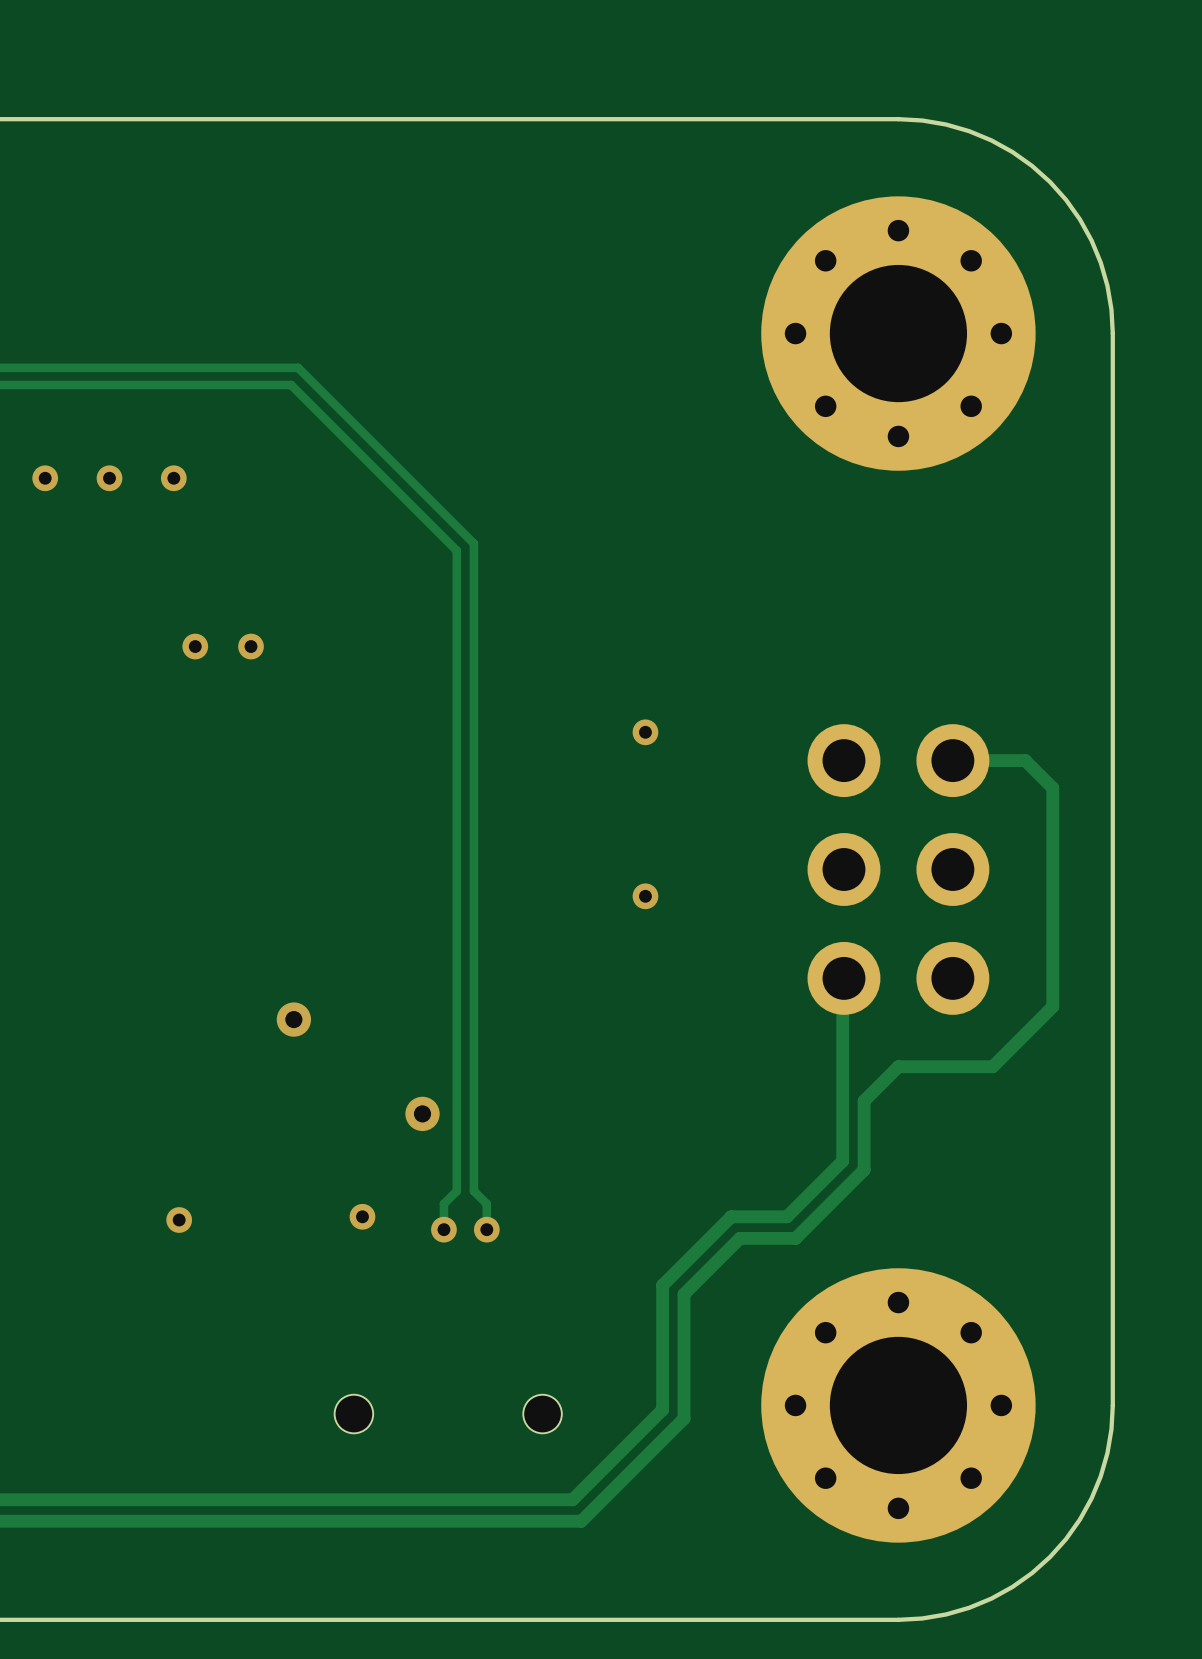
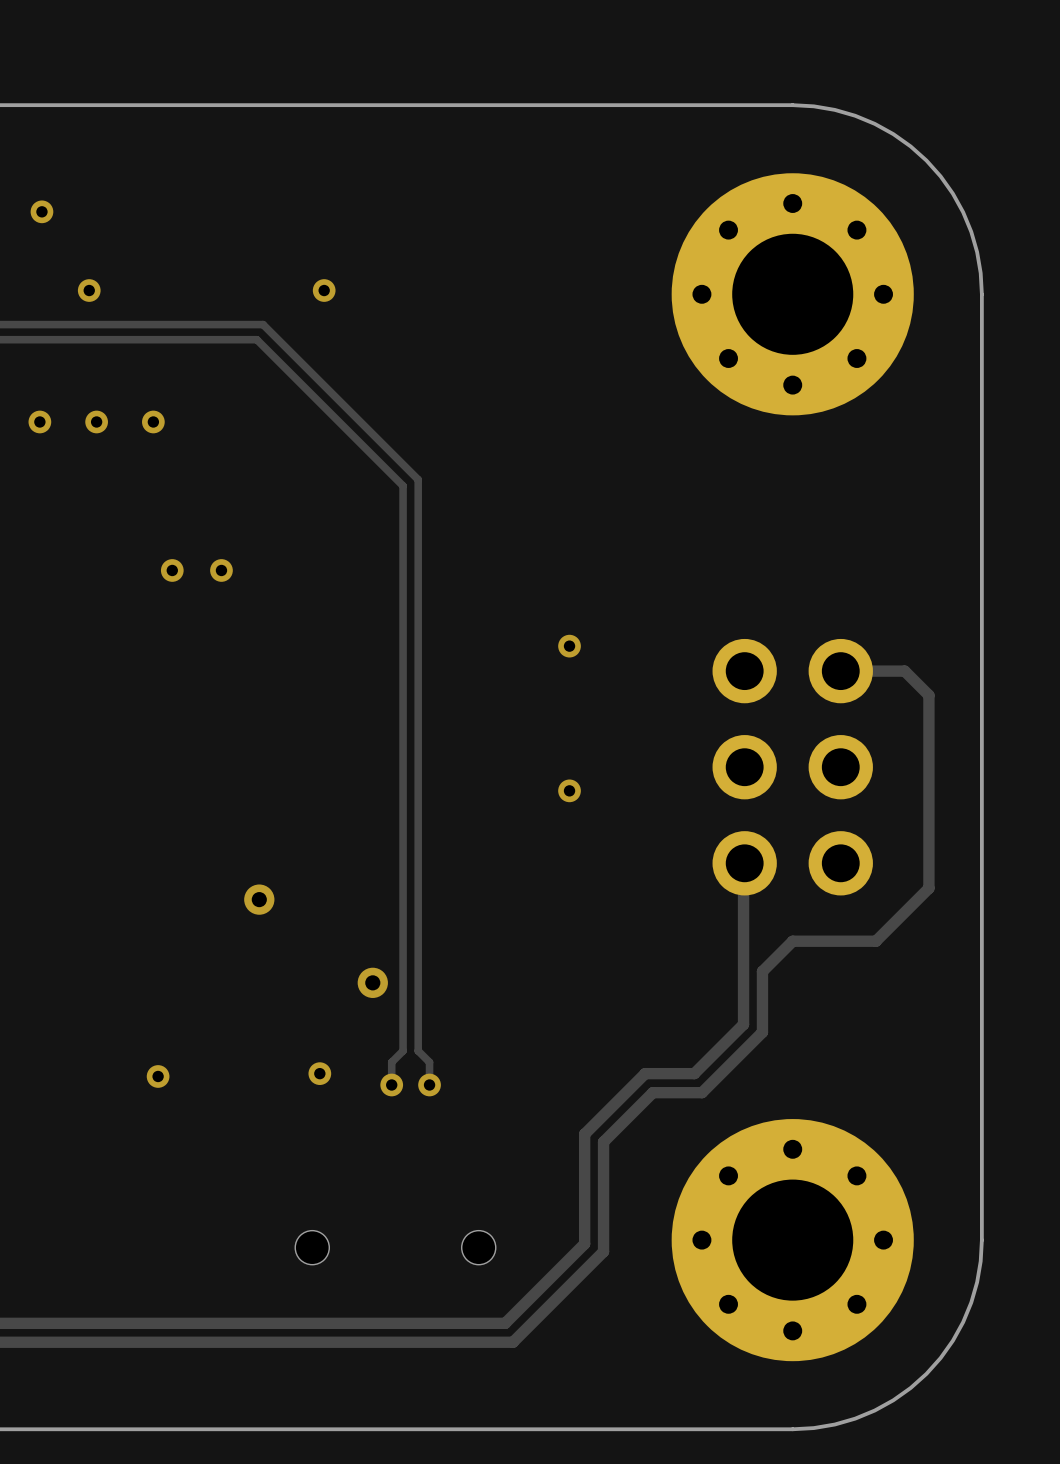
via: none -> (41, 211)
via: none -> (89, 290)
via: none -> (324, 290)

